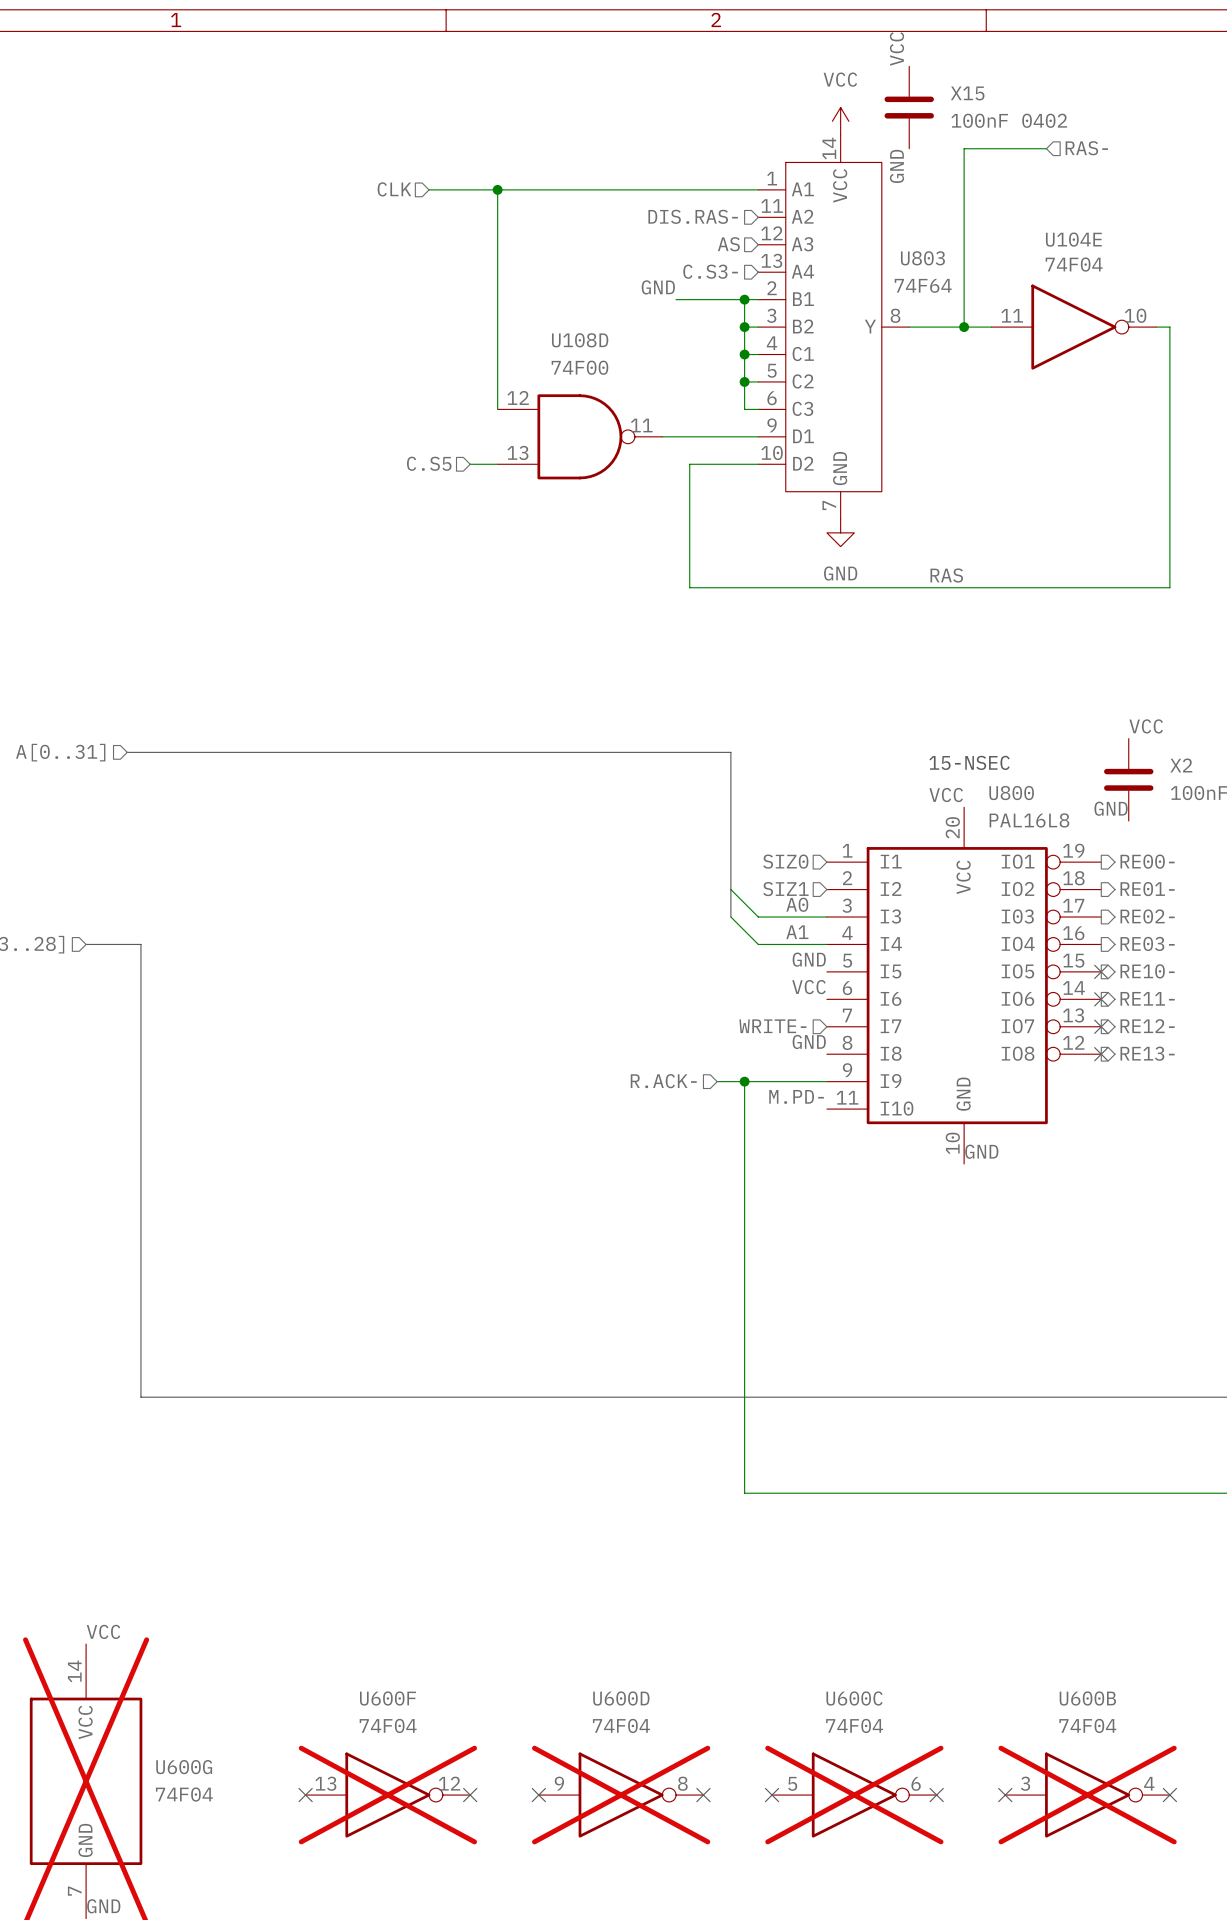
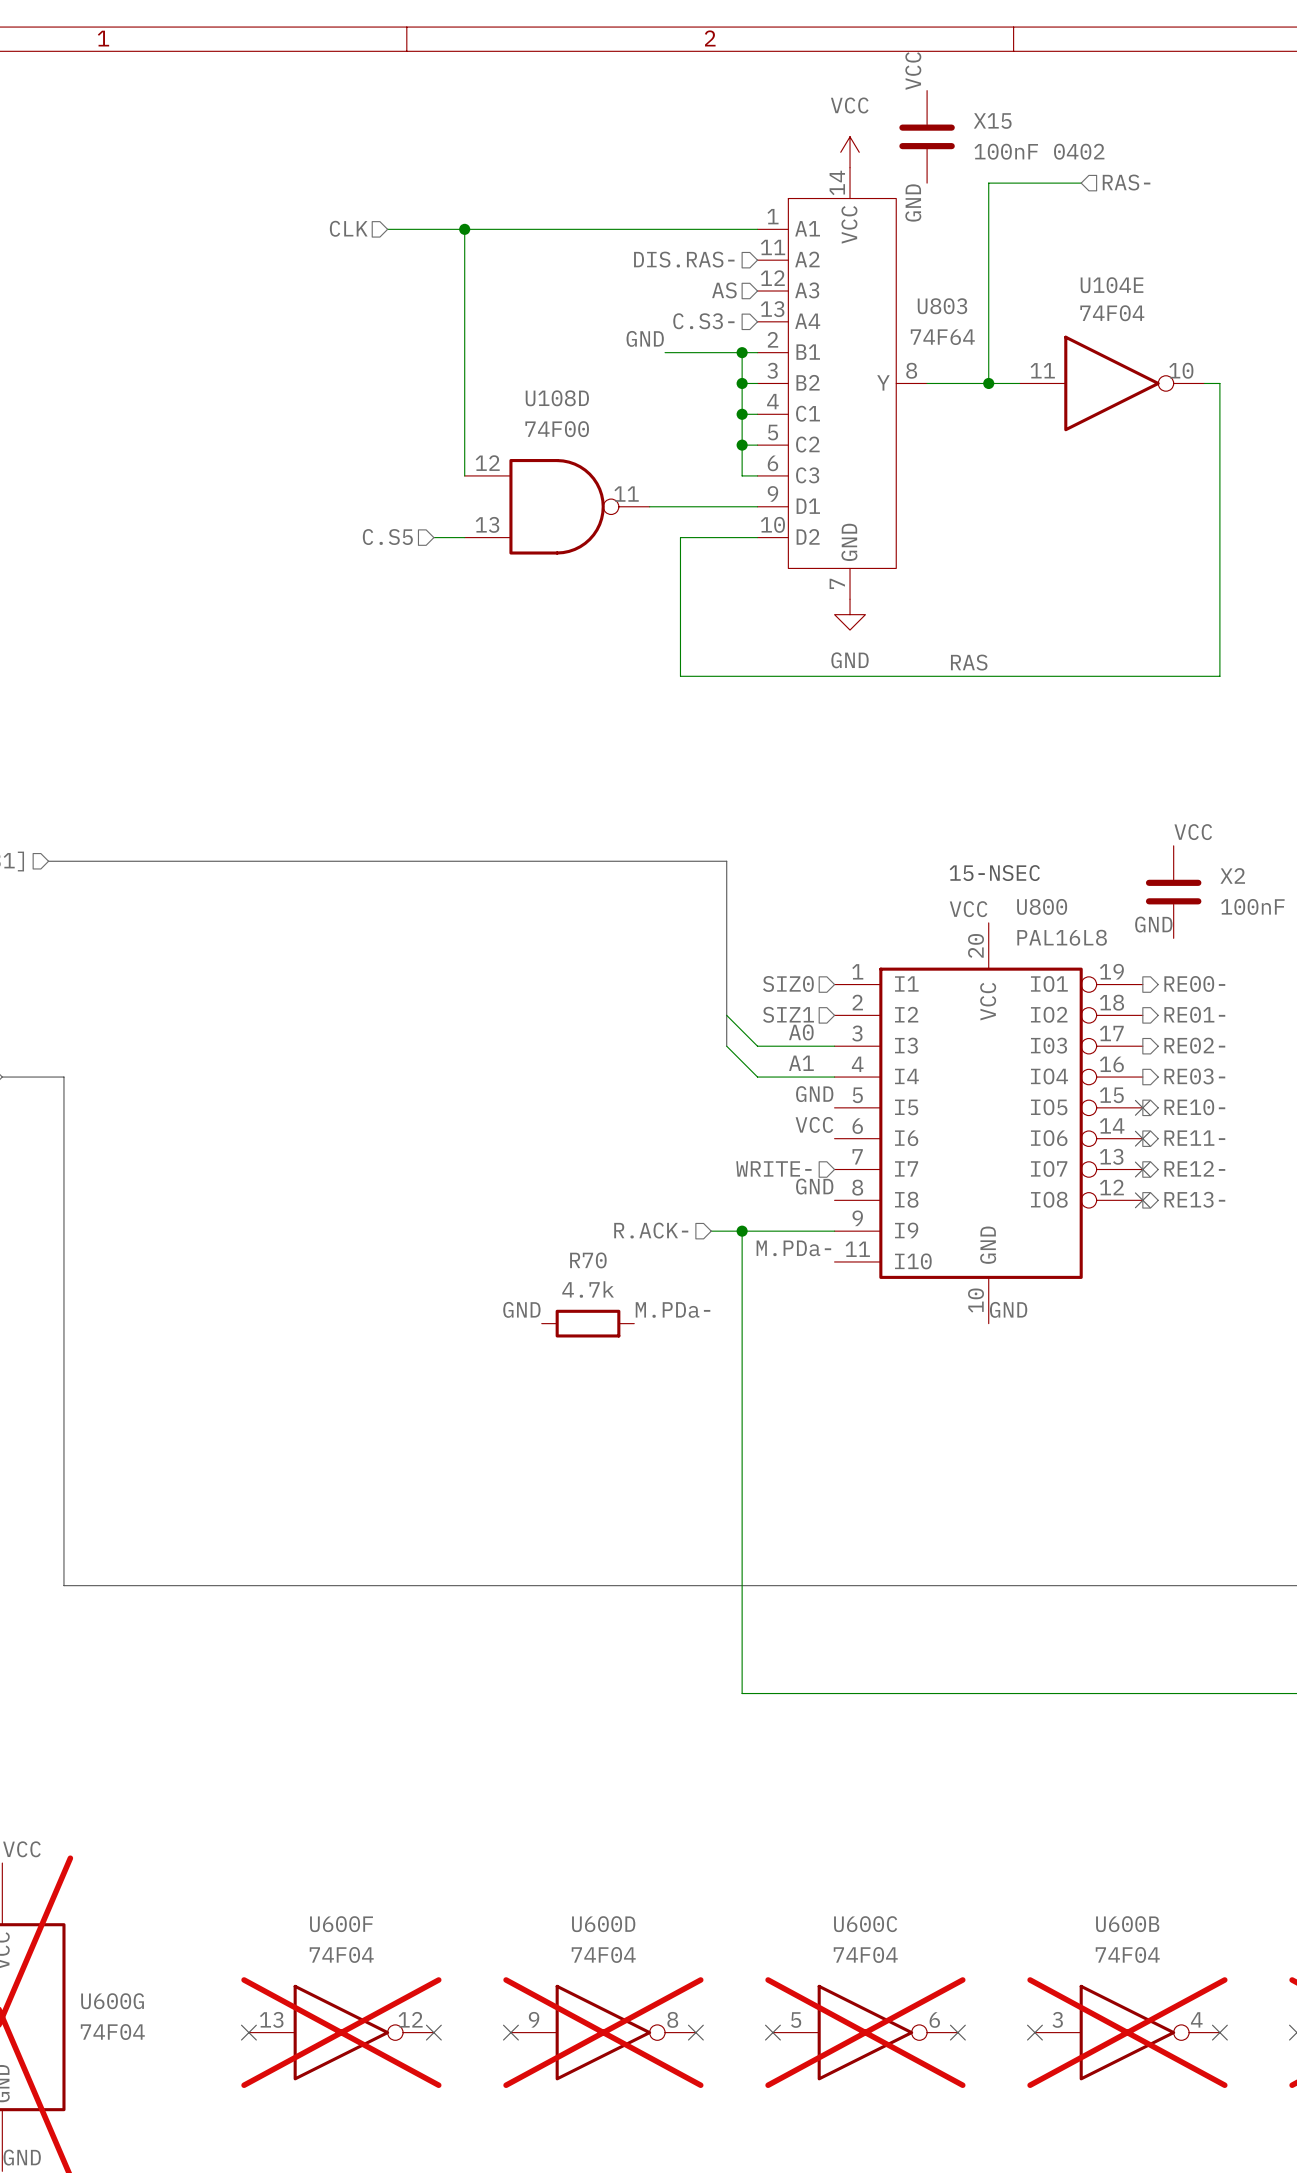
label: M.PD- (796, 1096) -> M.PDa- (793, 1248)
label: none -> GND (521, 1309)
label: none -> M.PDa- (673, 1310)
R70: none -> 4.7k (588, 1323)

